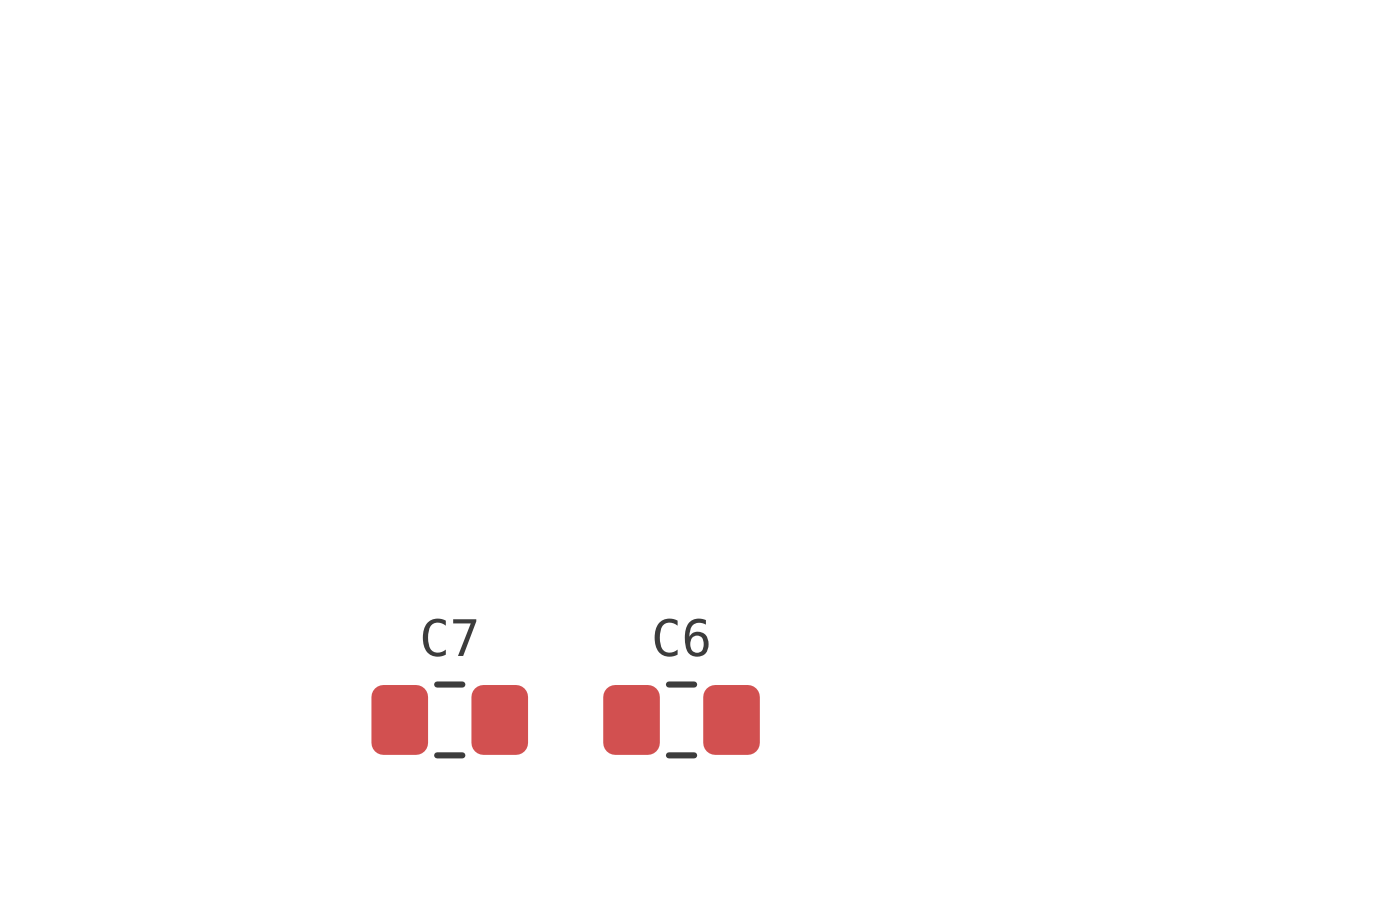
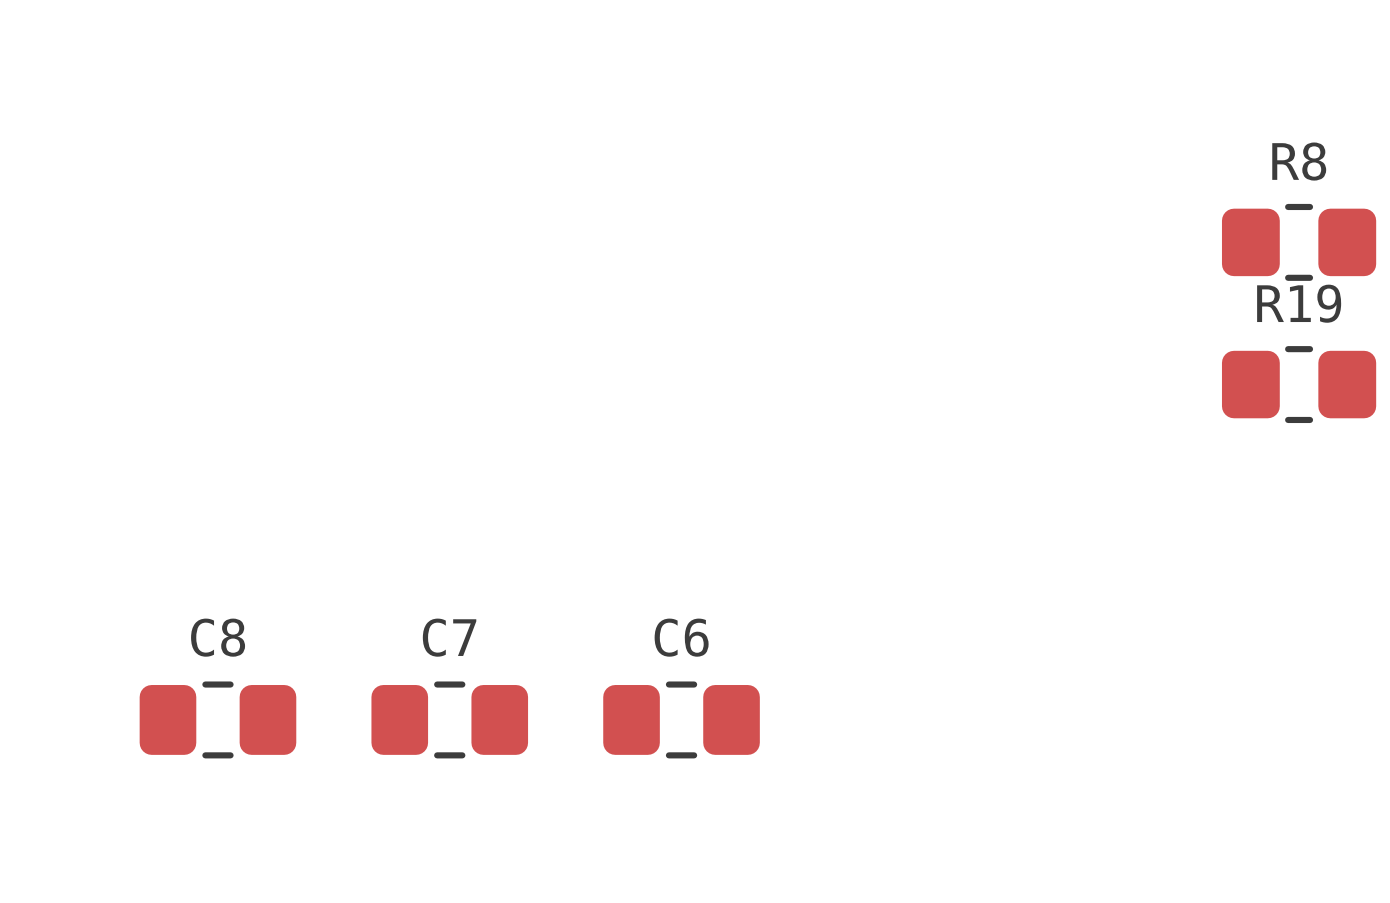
R8: none -> (1299, 242)
R19: none -> (1299, 384)
C8: none -> (217, 719)

